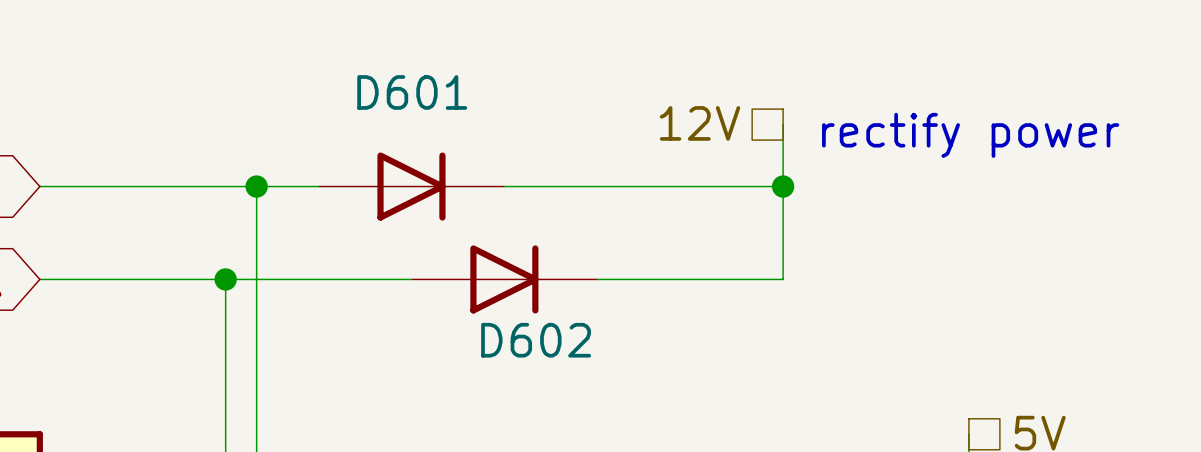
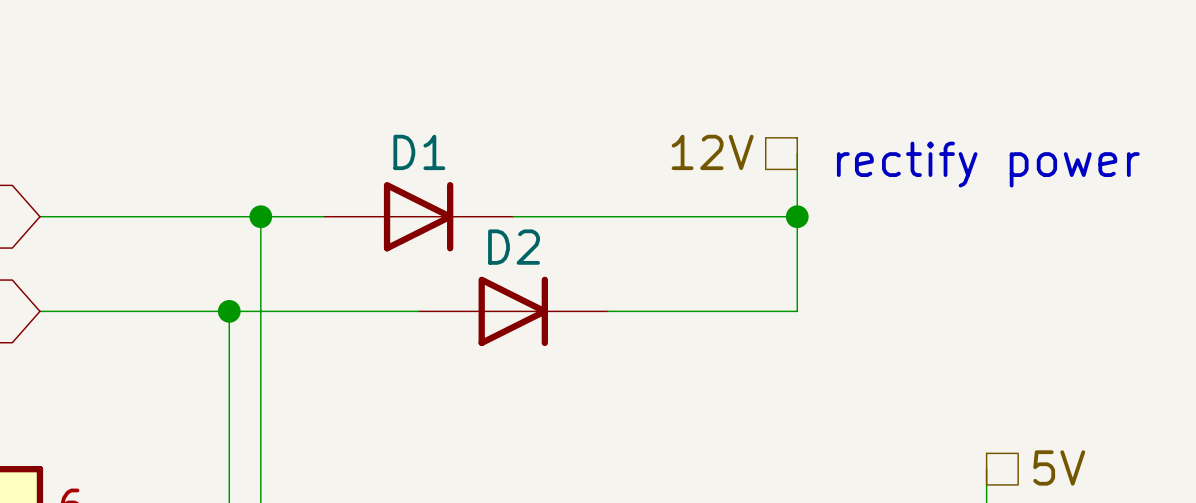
D601 name: D601 (412, 92) -> D1 (419, 152)
D602 name: D602 (536, 340) -> D2 (514, 247)

